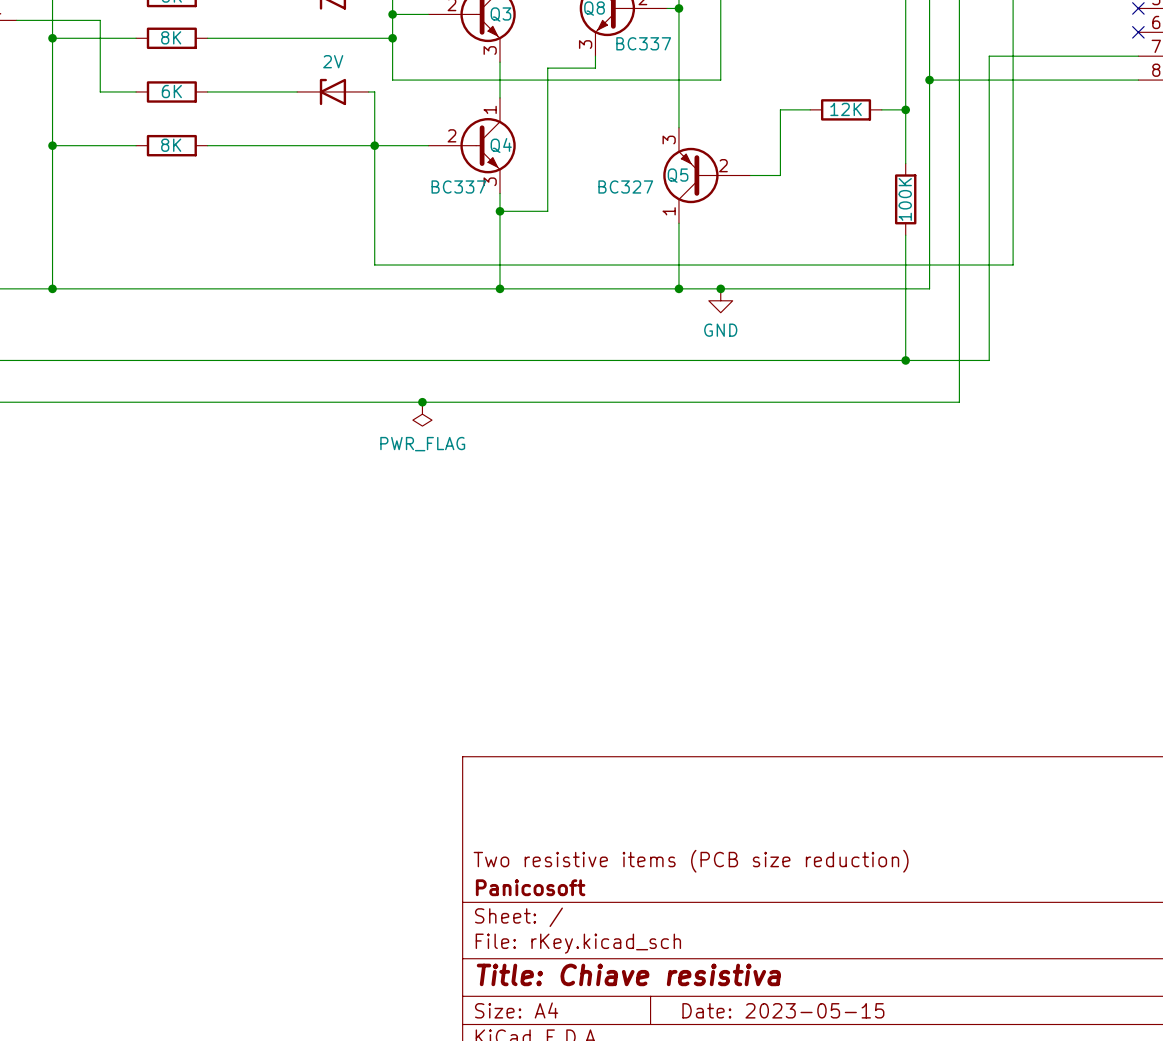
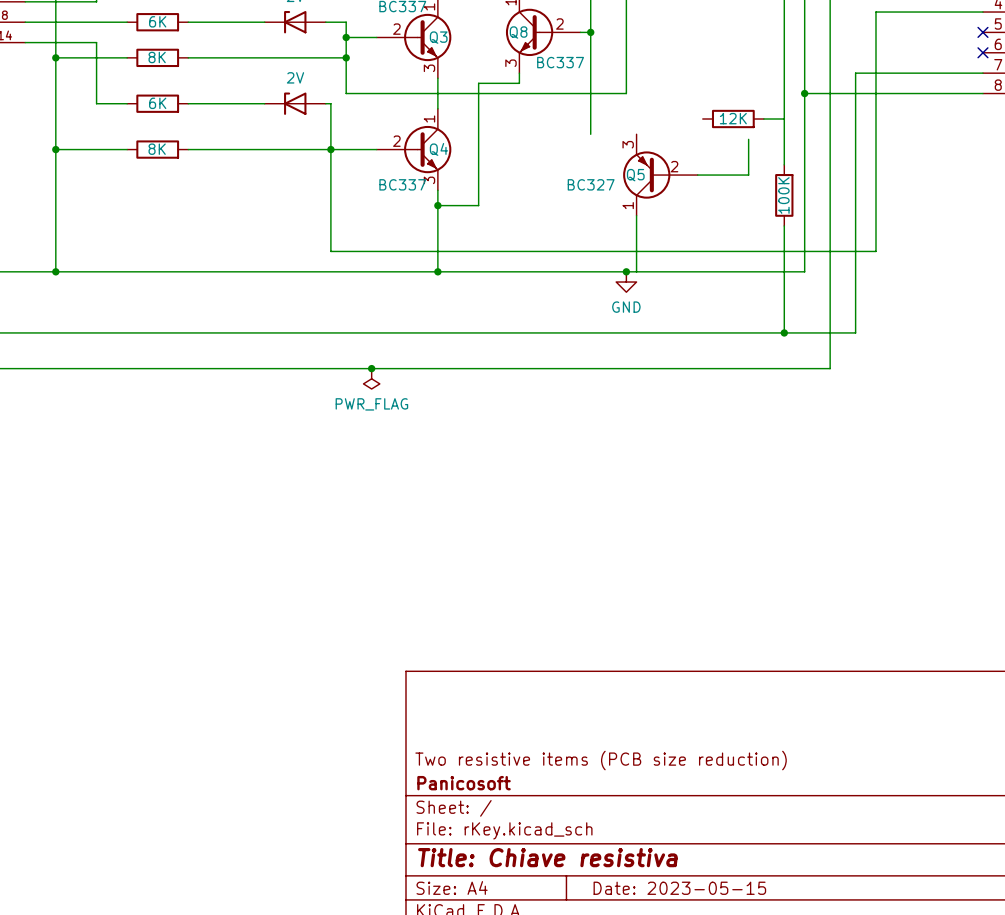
wire: (810, 109) (780, 109) (780, 175) (750, 175) -> none
junction: (905, 109) -> none
wire: none -> (748, 139) (748, 175) (697, 175)
Q5 position: (706, 175) -> (660, 175)
wire: (678, 223) (678, 288) -> (636, 215) (636, 271)
junction: (678, 288) -> none

